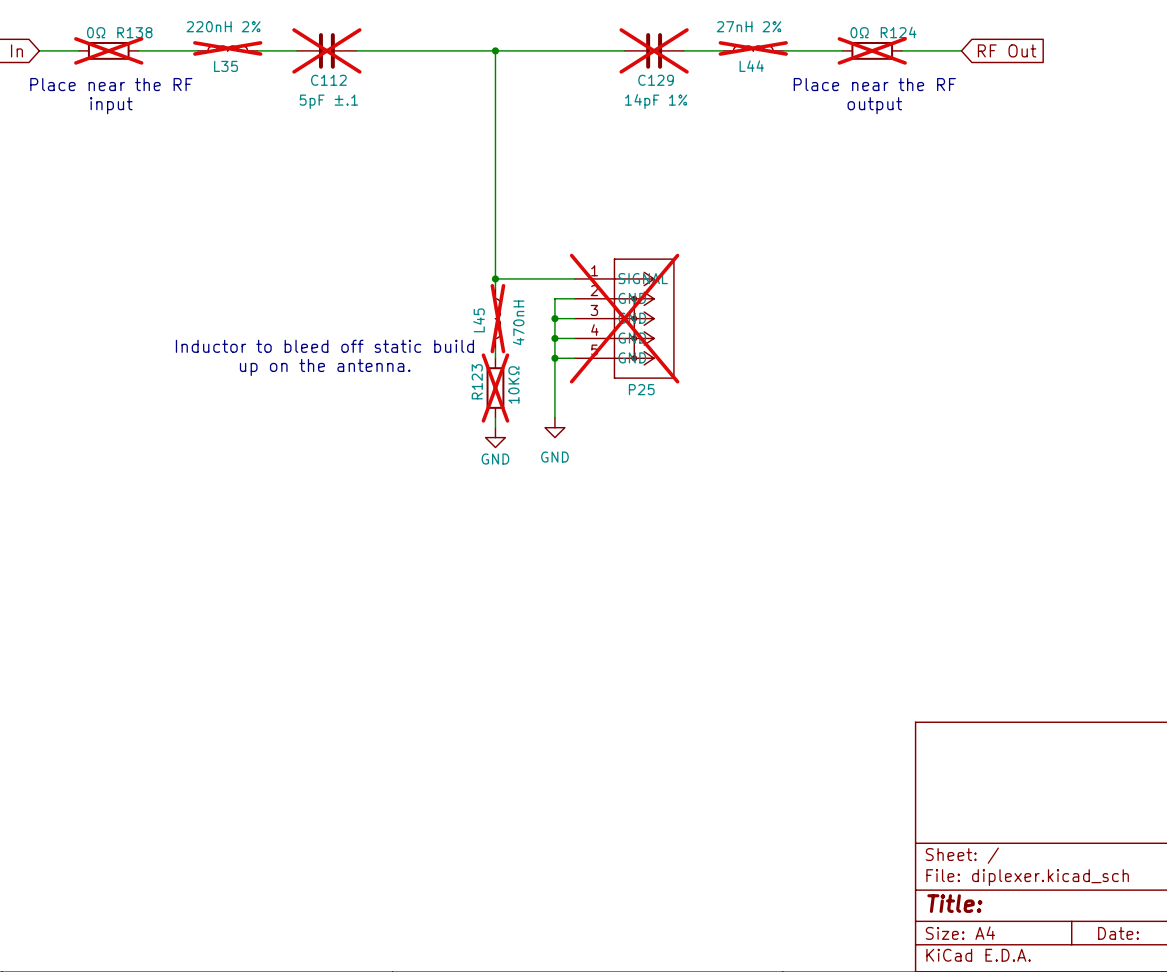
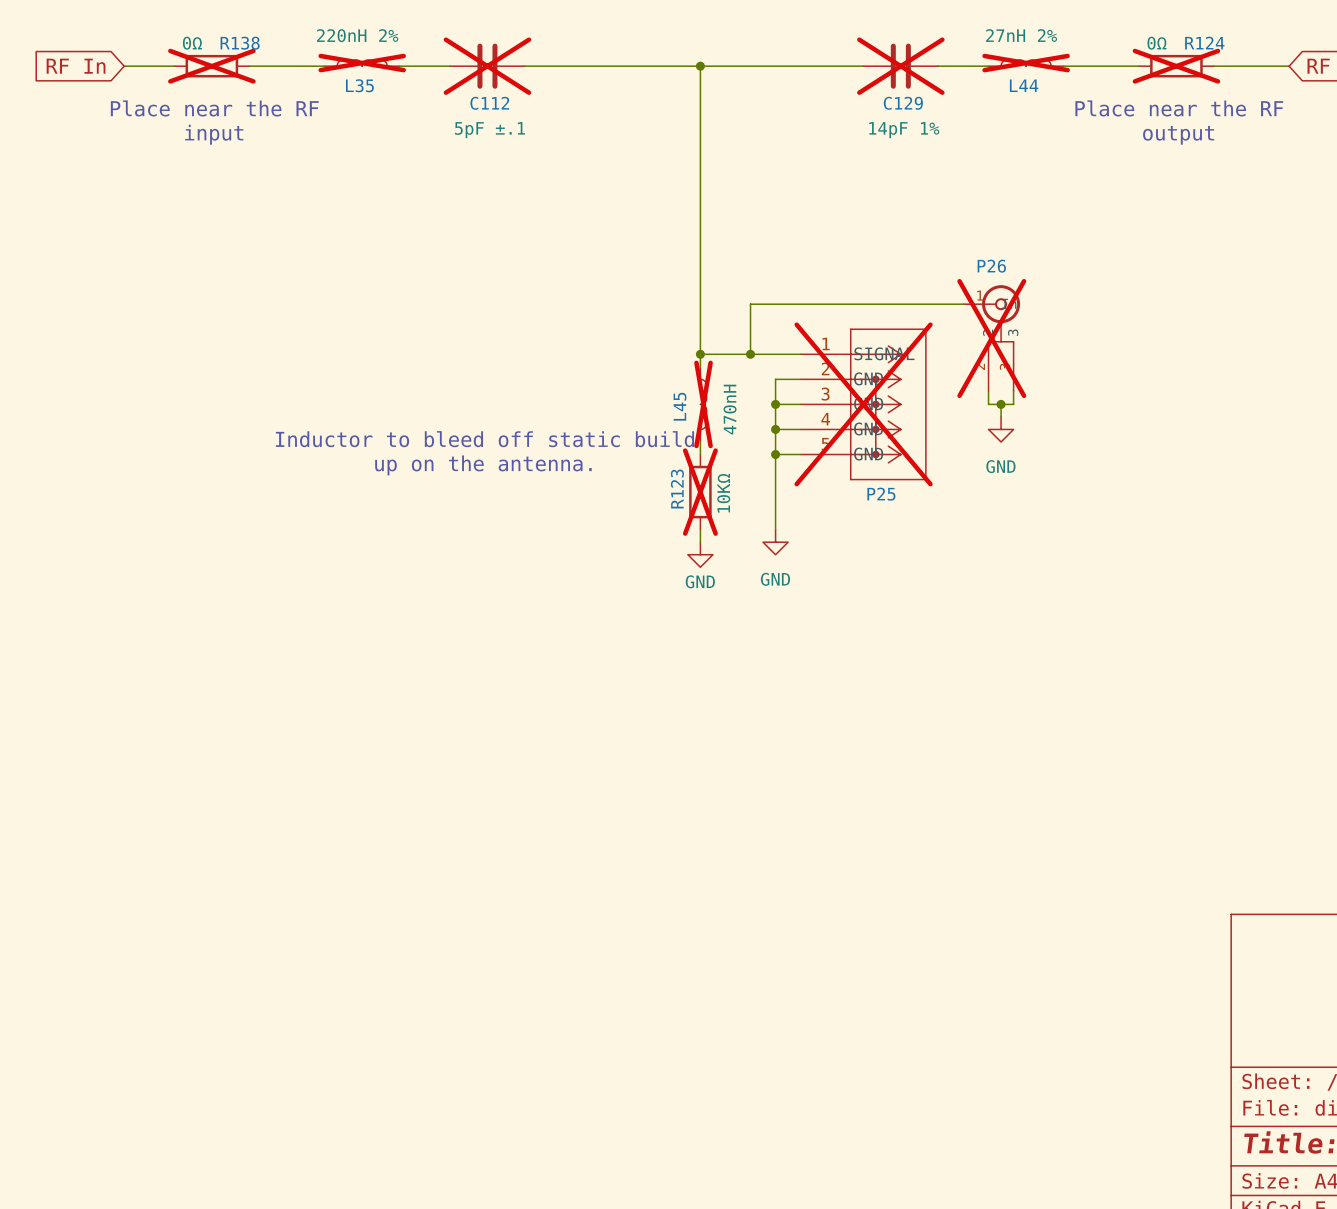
wire: none -> (963, 304) (750, 304) (750, 354)
P26: none -> (991, 338)
junction: none -> (750, 354)
wire: none -> (988, 391) (988, 404) (1013, 404) (1013, 391)
wire: none -> (1001, 404) (1001, 416)
junction: none -> (1001, 404)
power symbol: none -> GND (1001, 429)

